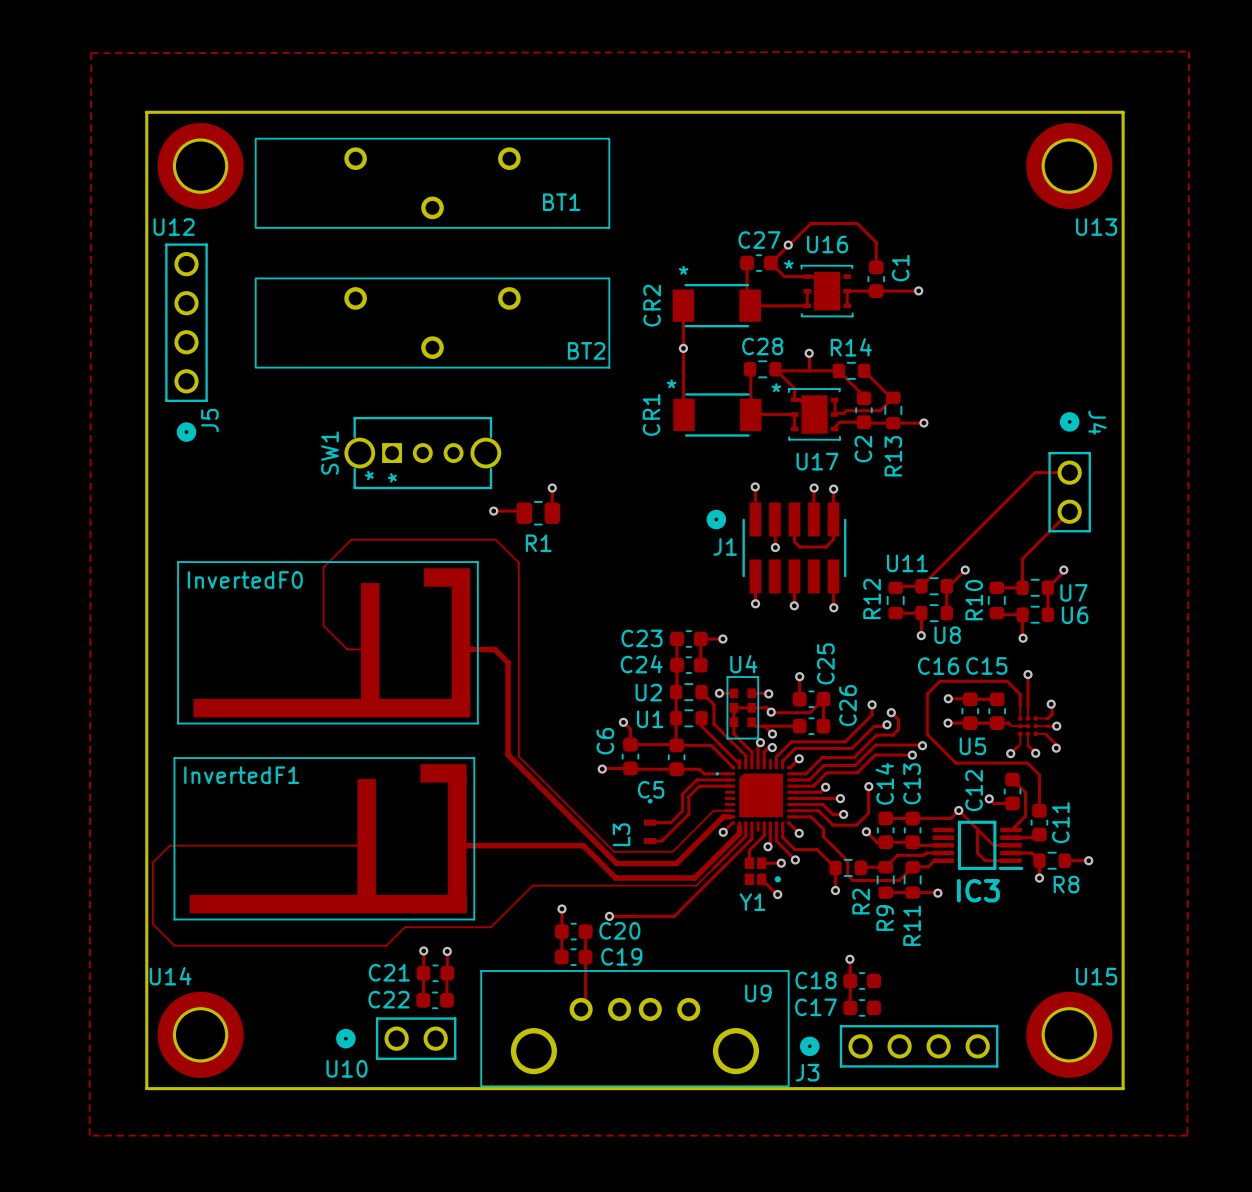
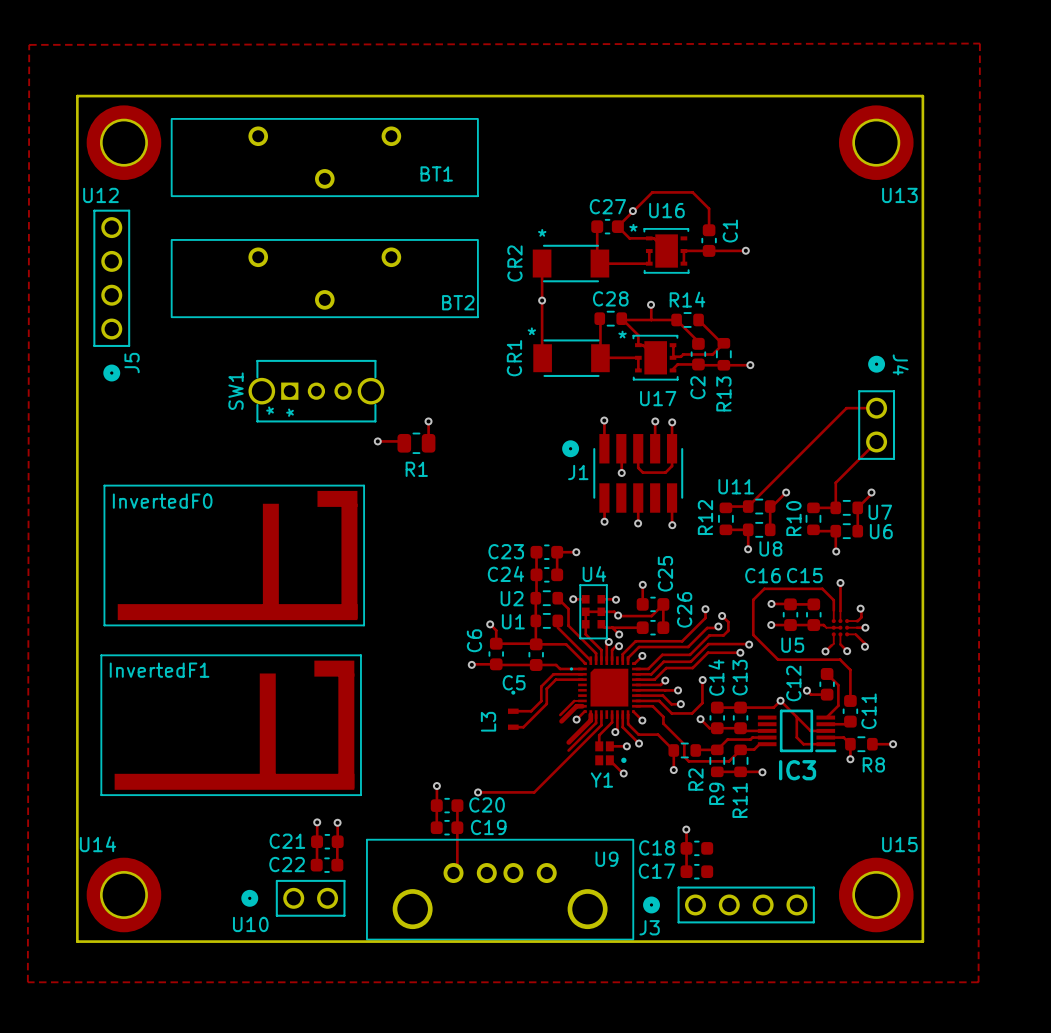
track: (370, 649) (347, 649) (323, 625) (323, 567) (351, 539) (495, 539) (518, 562) (518, 756) (614, 851) (672, 851) (713, 810) (720, 810) -> (560, 715) (574, 700)
track: (460, 649) (494, 649) (508, 662) (508, 754) (616, 863) (676, 863) (705, 834) -> none
track: (366, 845) (169, 845) (152, 862) (152, 924) (174, 945) (386, 945) (405, 927) (491, 927) (532, 885) (696, 885) (713, 868) -> none
track: (461, 845) (583, 845) (615, 877) (694, 877) (714, 858) -> none

